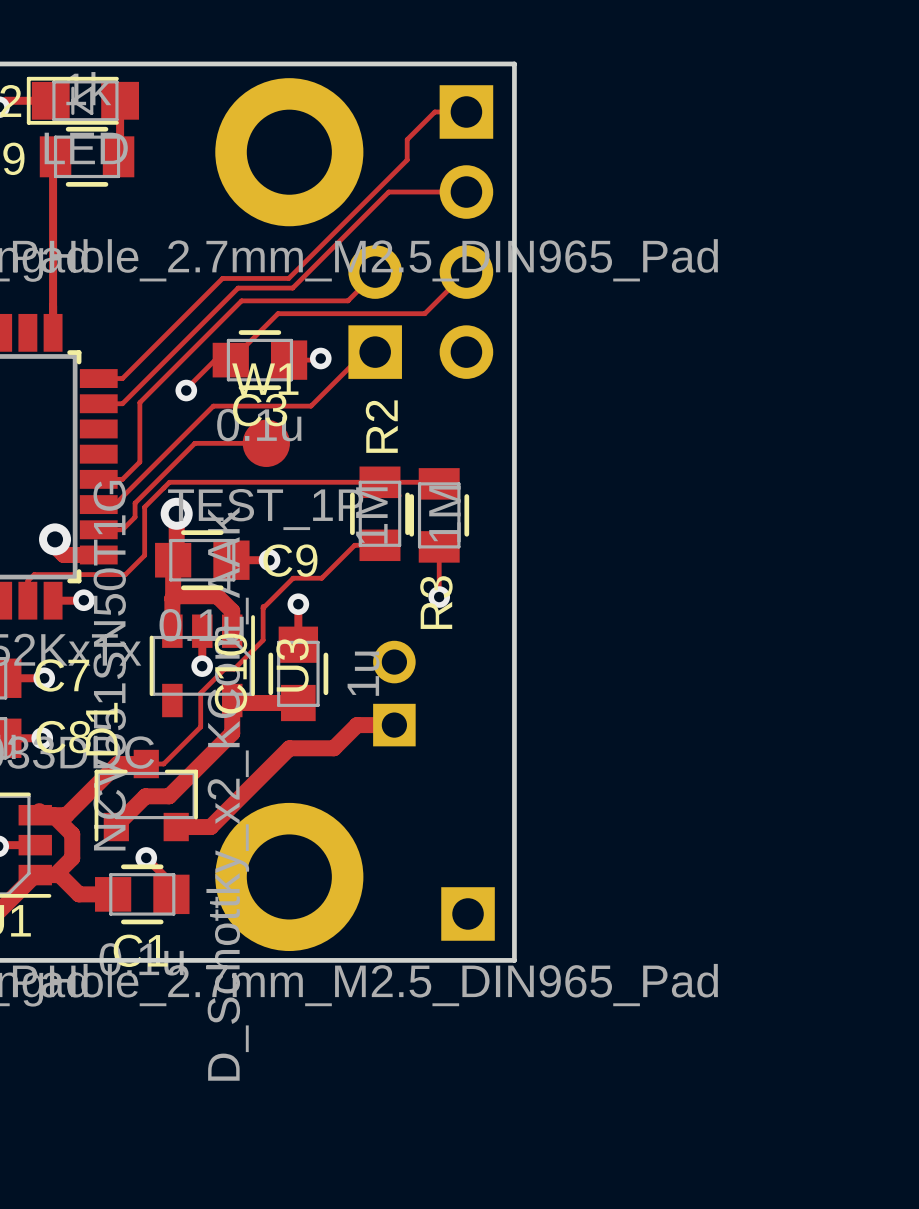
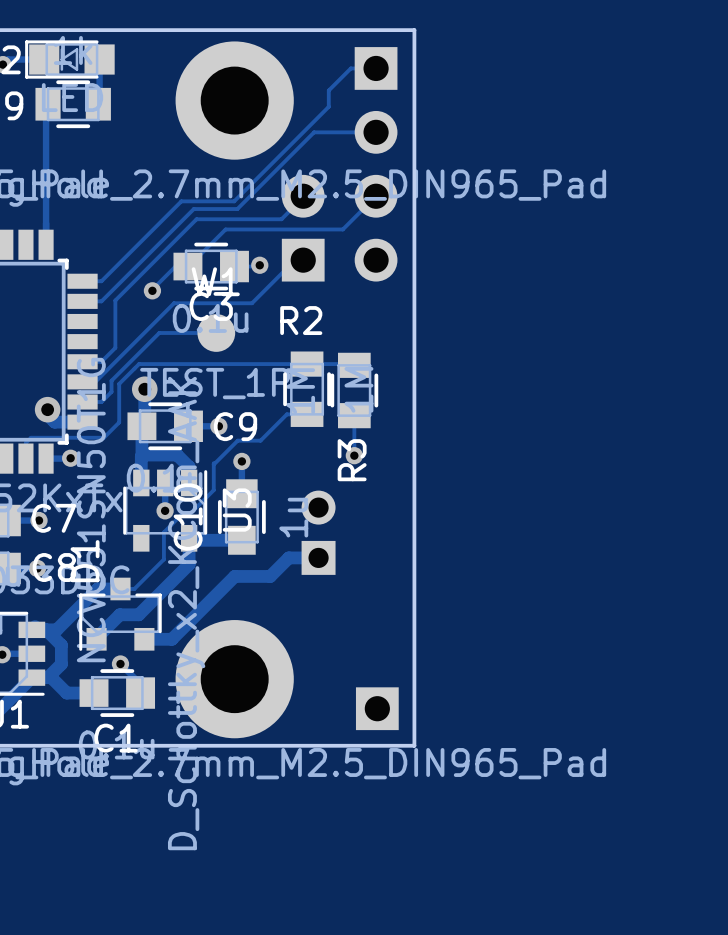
R2 name rotation: 0° (381, 426) -> 90° clockwise (301, 320)

